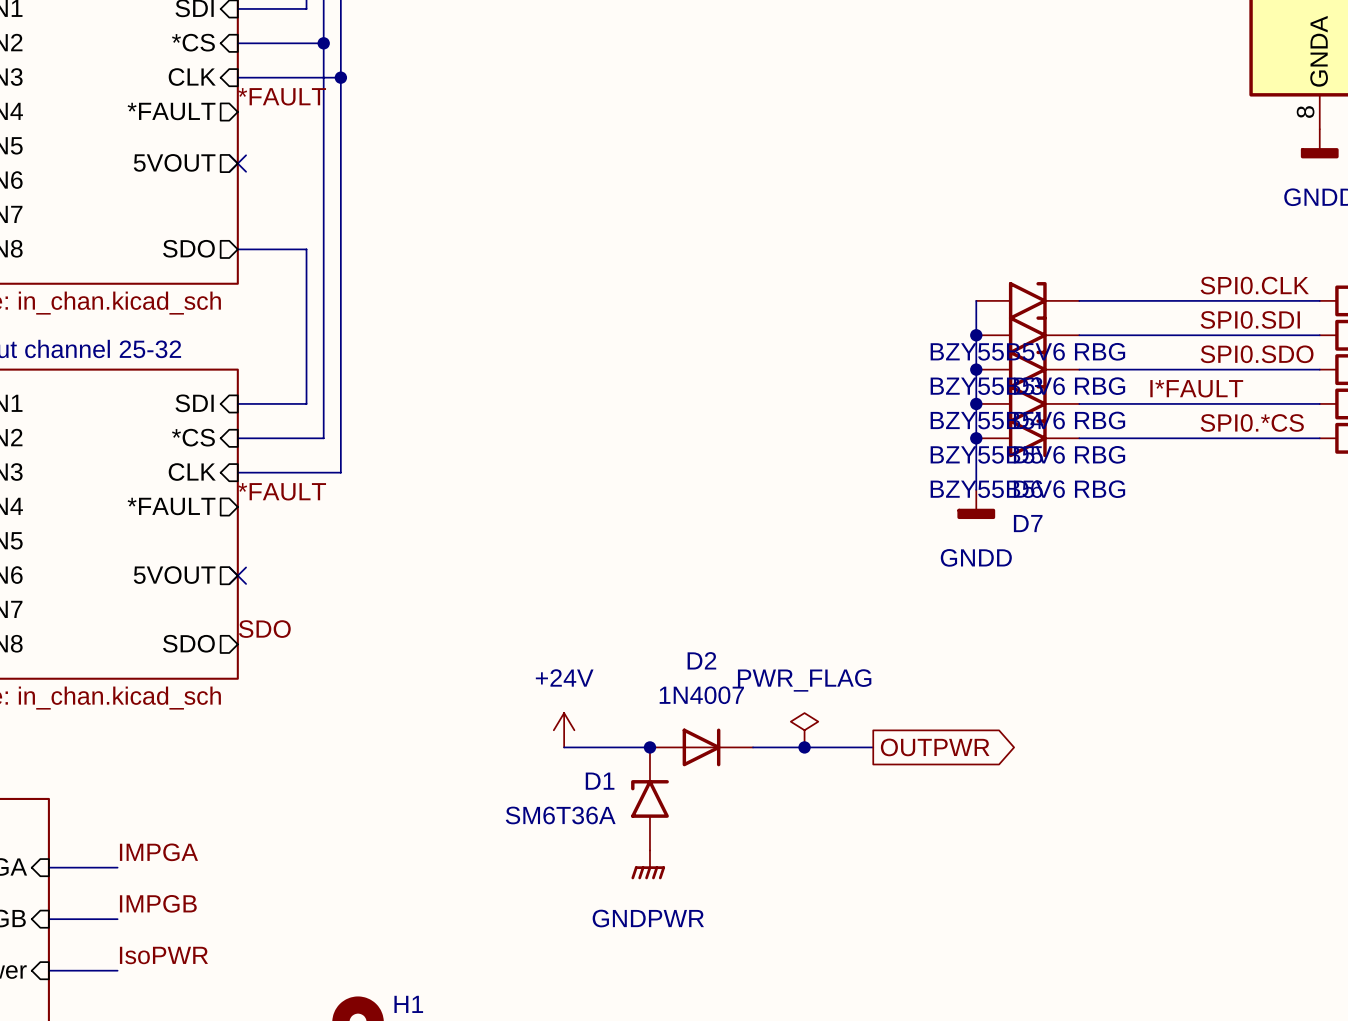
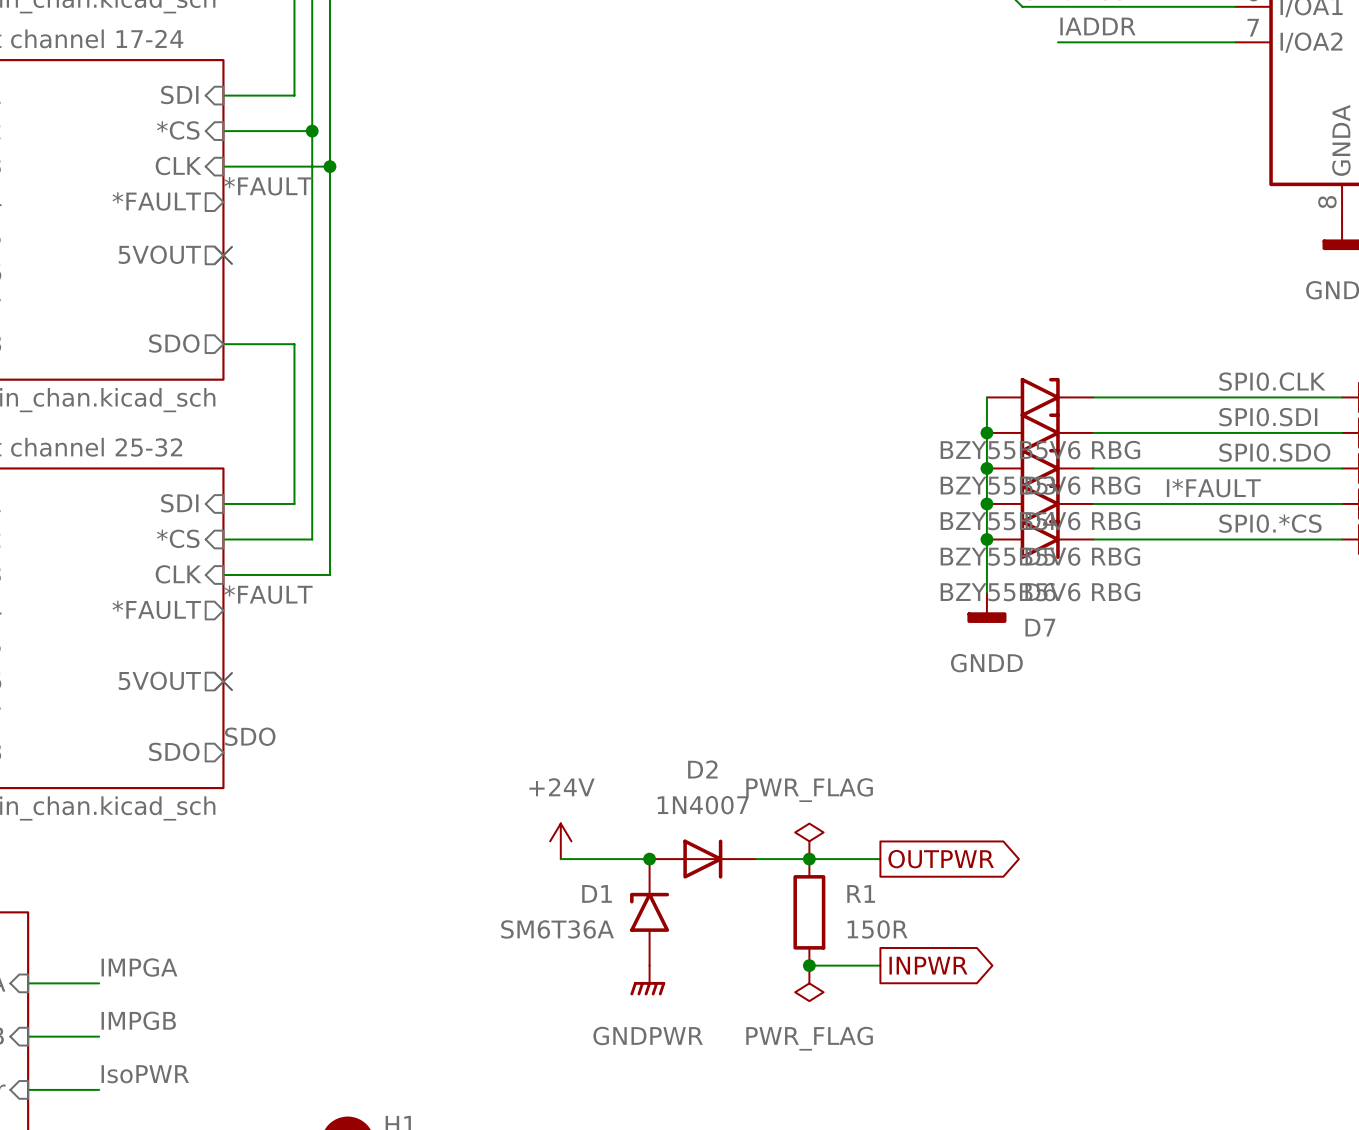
R1: none -> 150R (809, 912)
wire: none -> (809, 965) (880, 965)
junction: none -> (809, 965)
global label: none -> INPWR (928, 965)
power symbol: none -> PWR_FLAG (809, 983)

